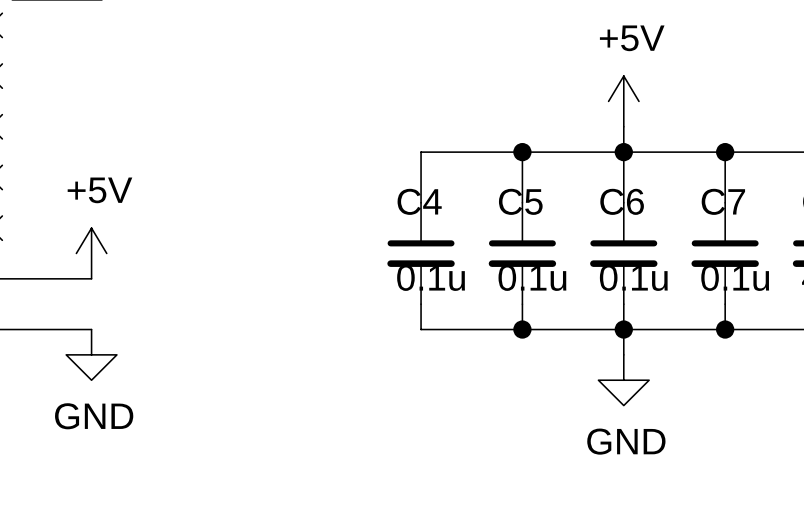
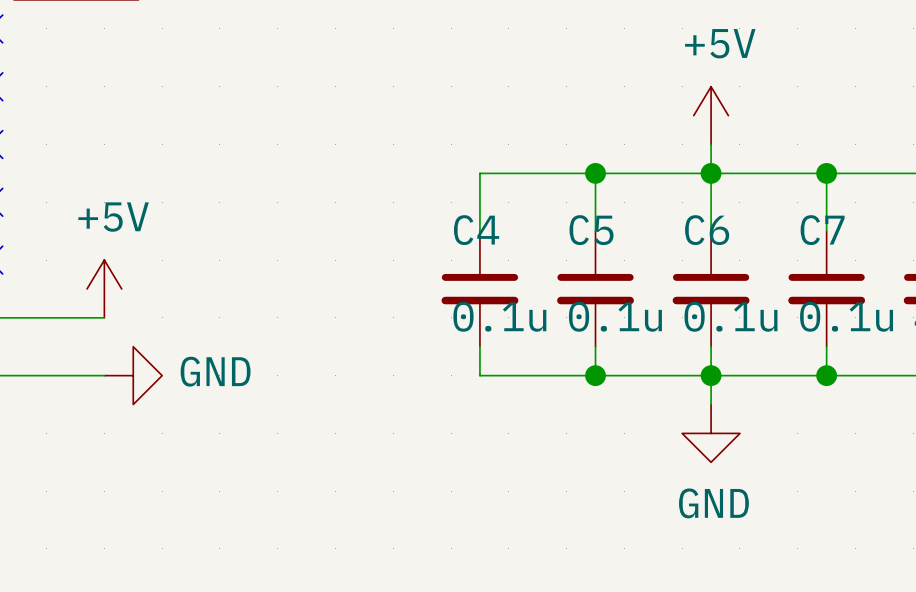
power symbol rotation: 0° (91, 354) -> 90° counterclockwise (133, 375)
power symbol position: GND (91, 354) -> GND (133, 375)

